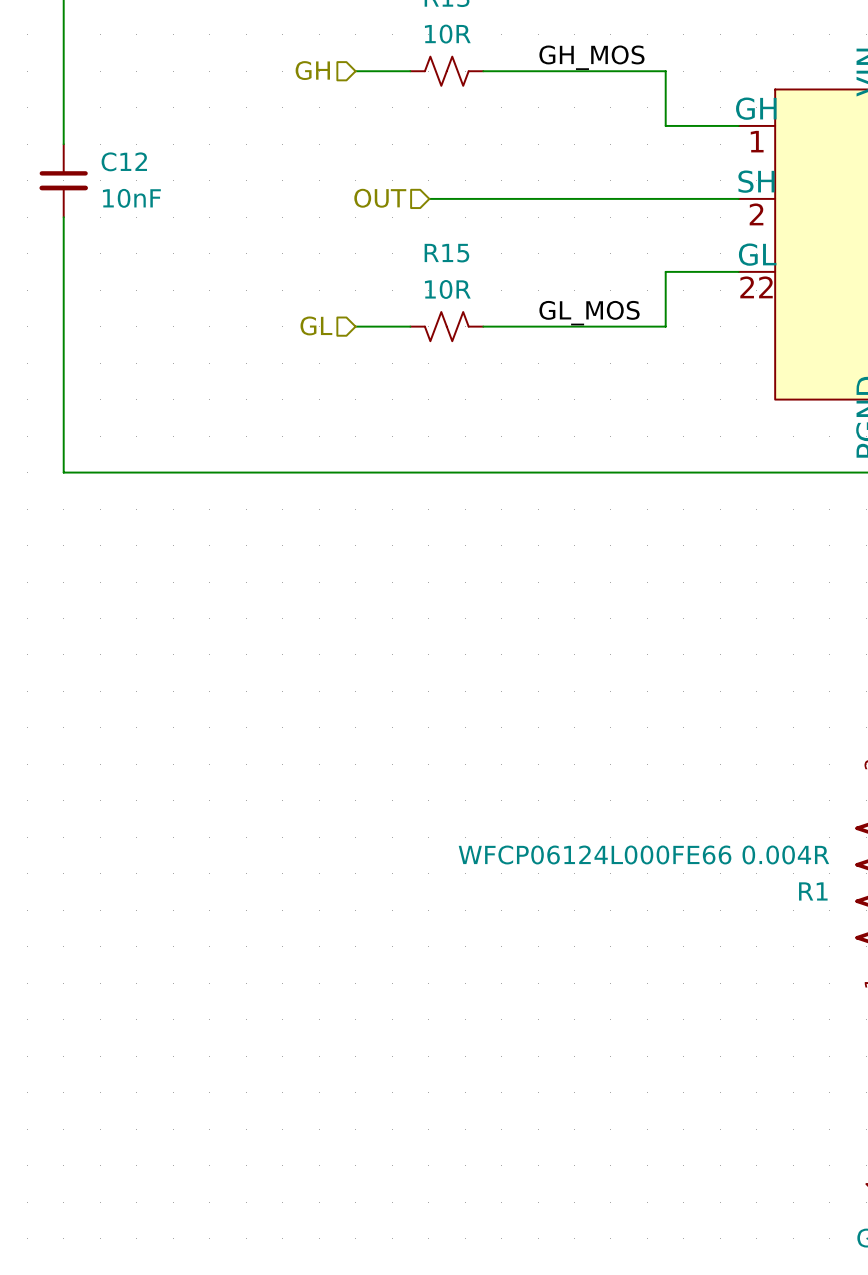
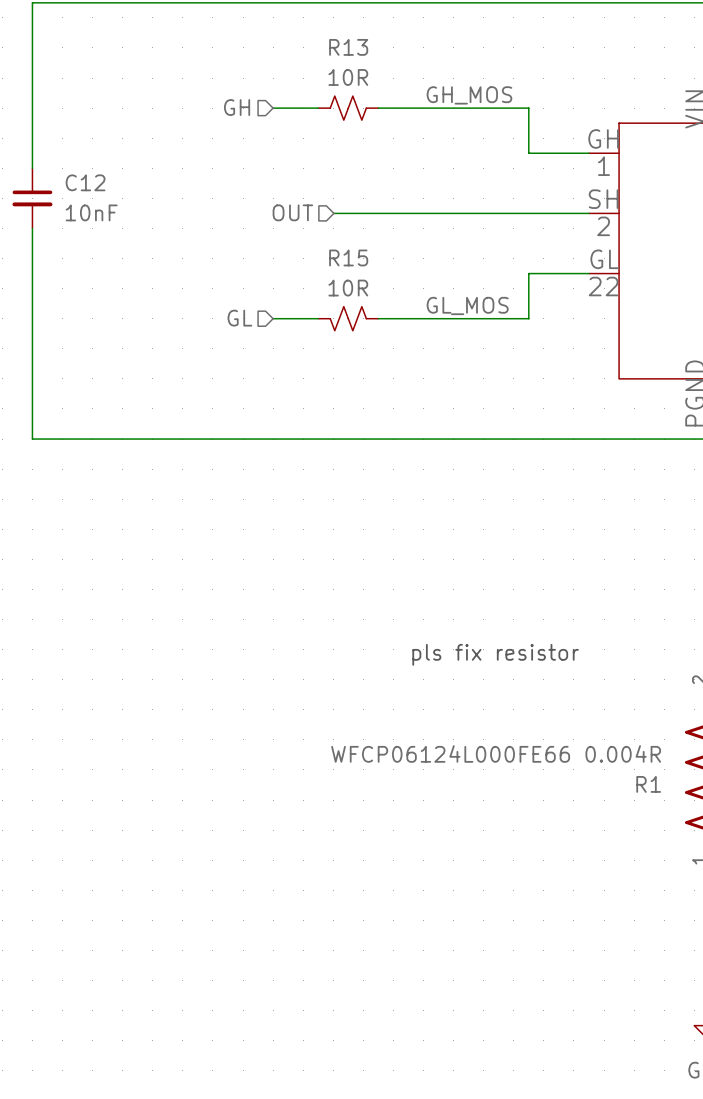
text: none -> pls fix resistor (495, 654)

